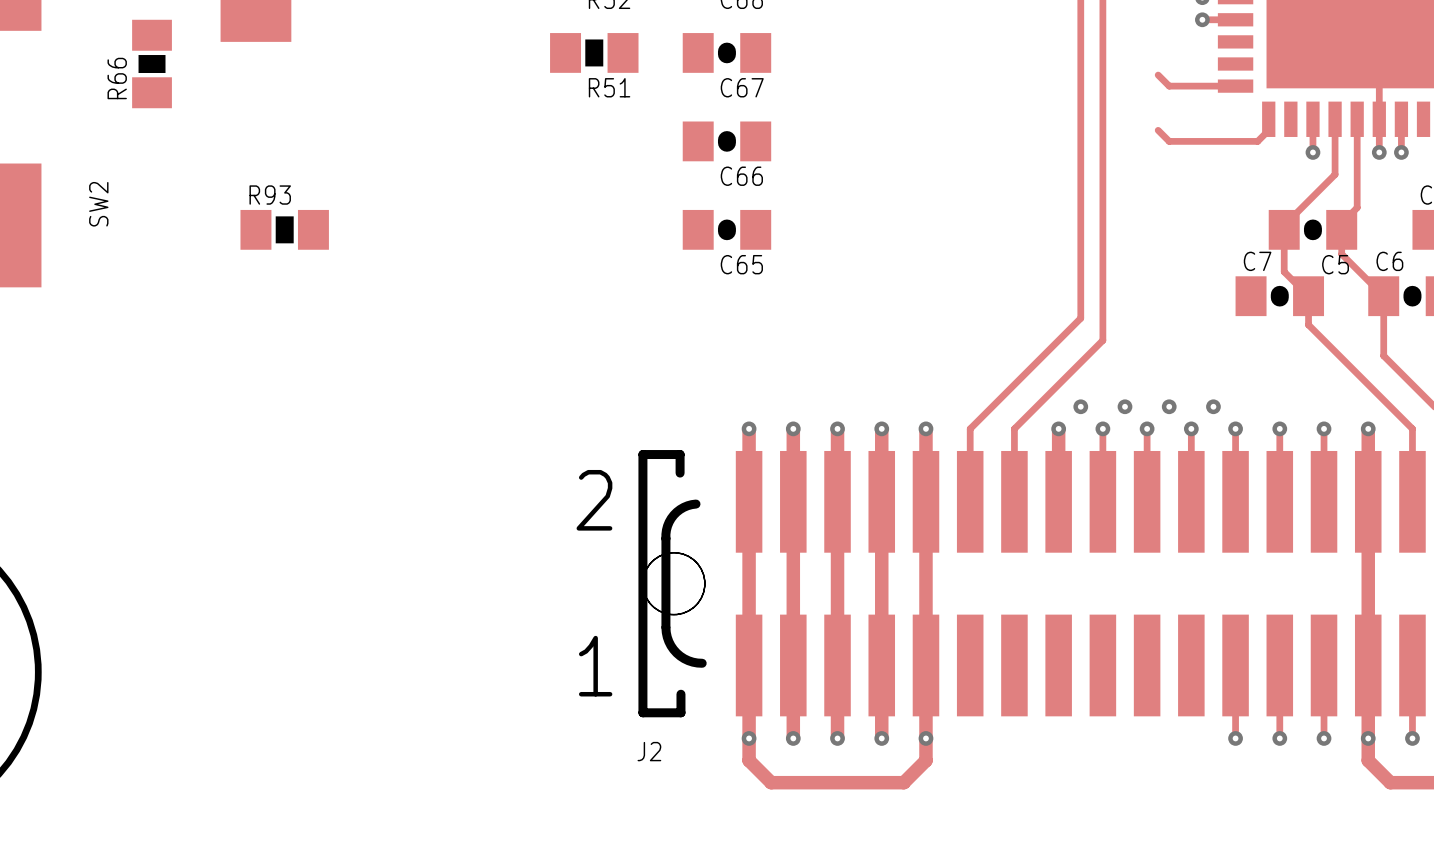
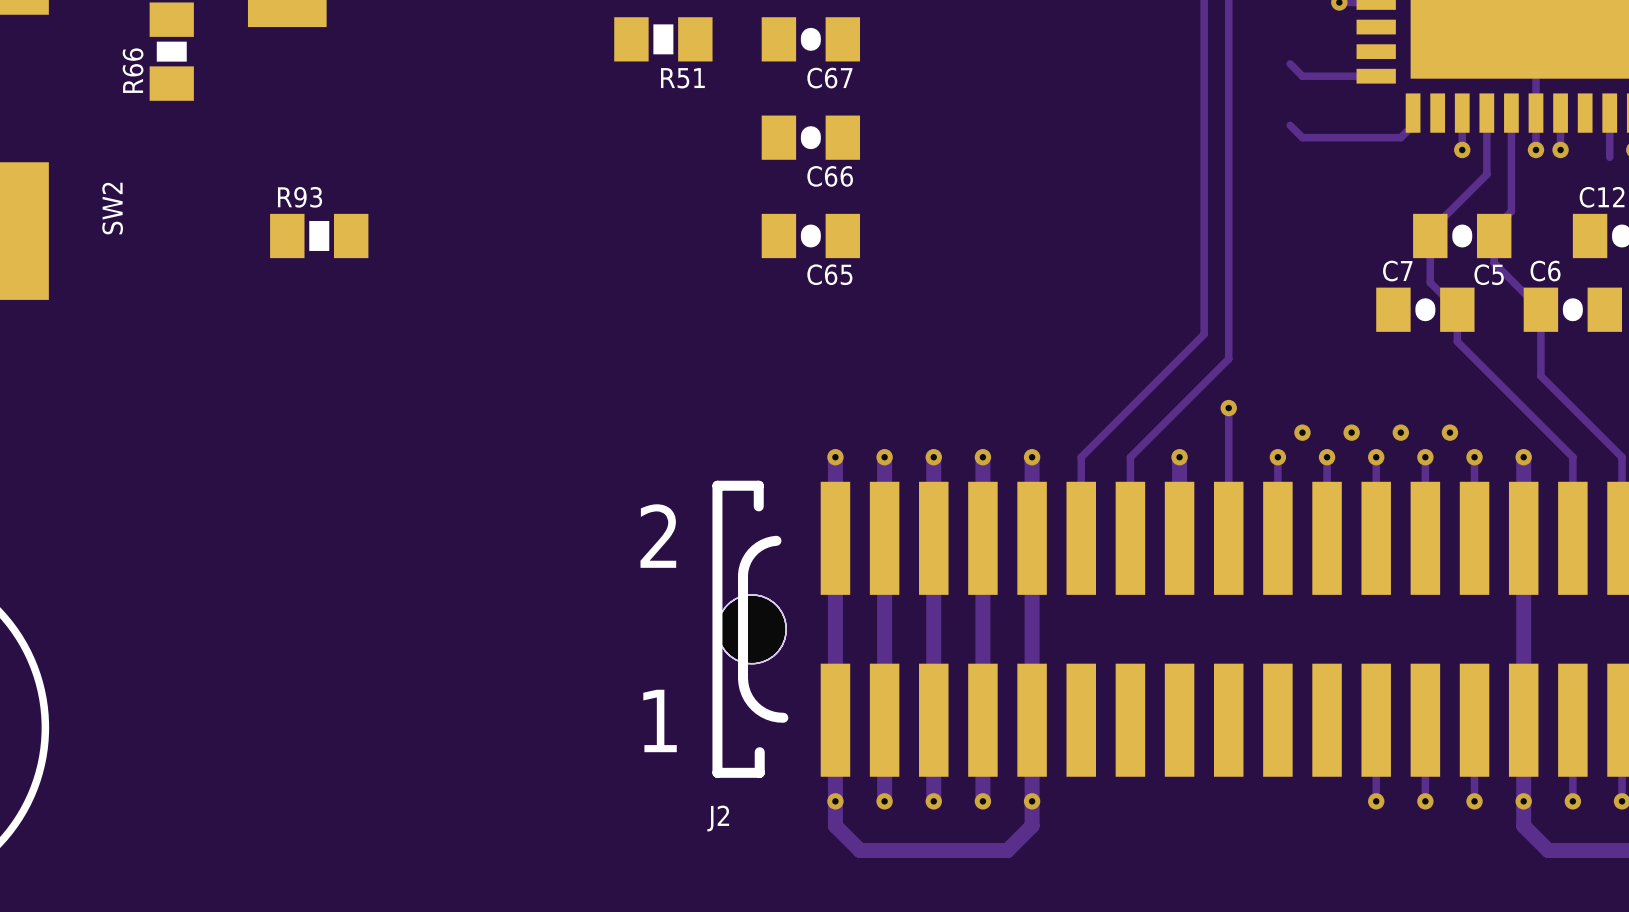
track: none -> (1228, 408) (1228, 457)
via: none -> (1228, 408)
via: (1080, 406) -> none
via: (1125, 406) -> none
via: none -> (1400, 432)
via: none -> (1449, 432)
via: (1102, 428) -> none

